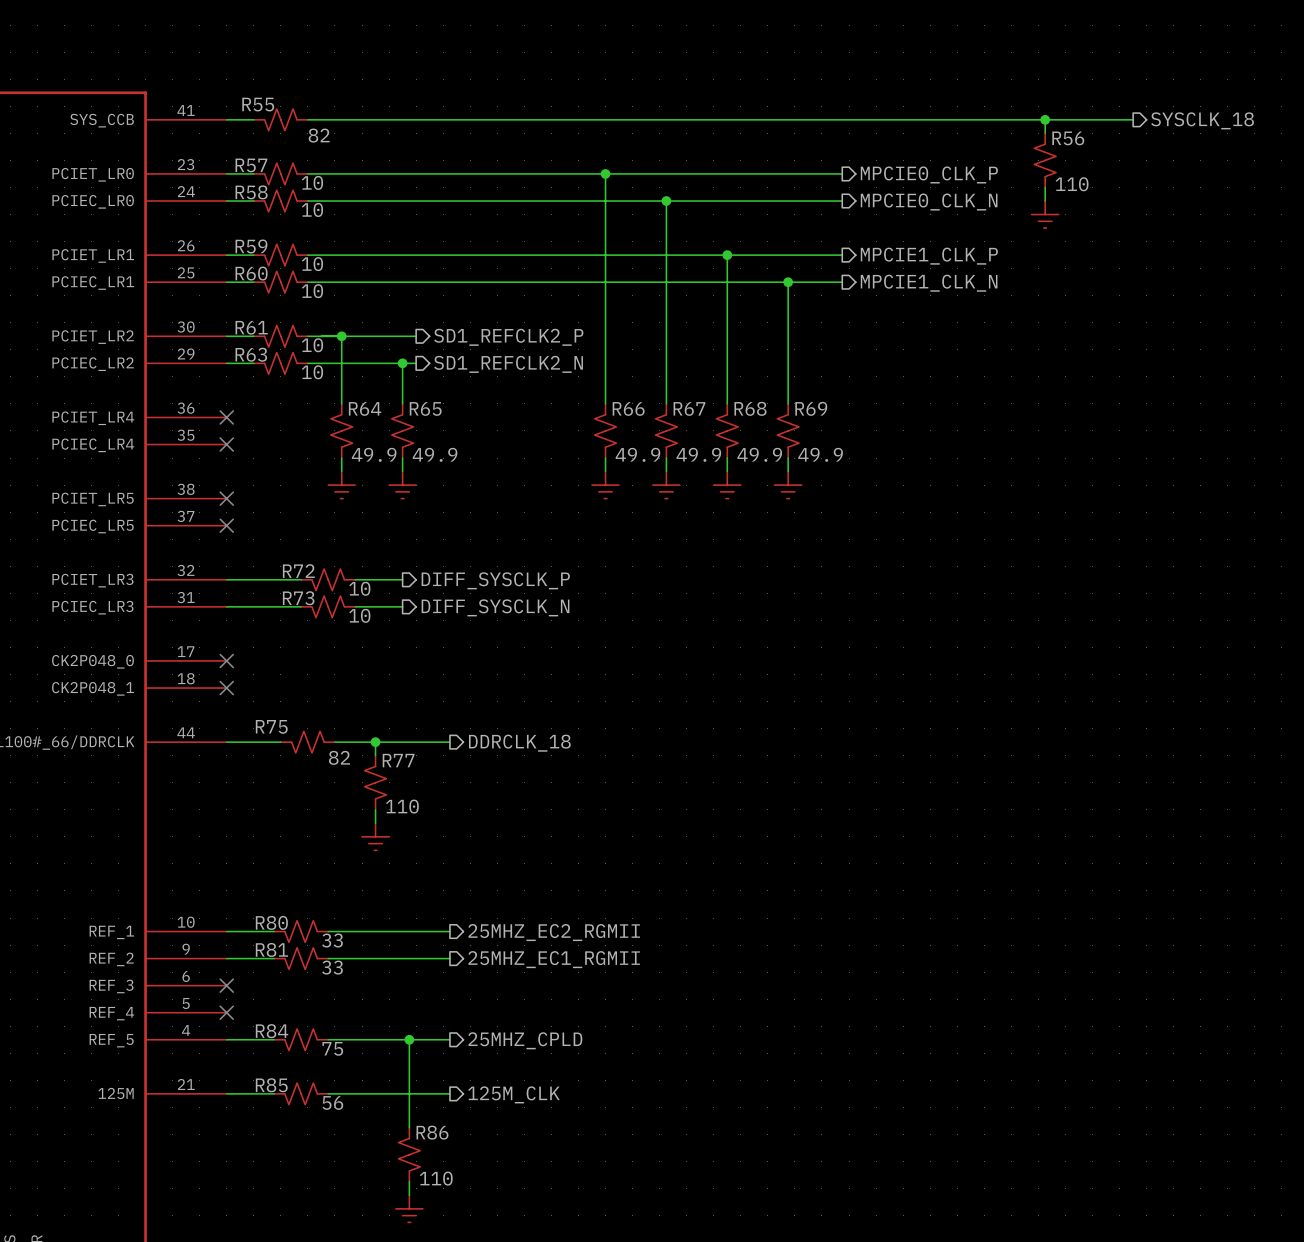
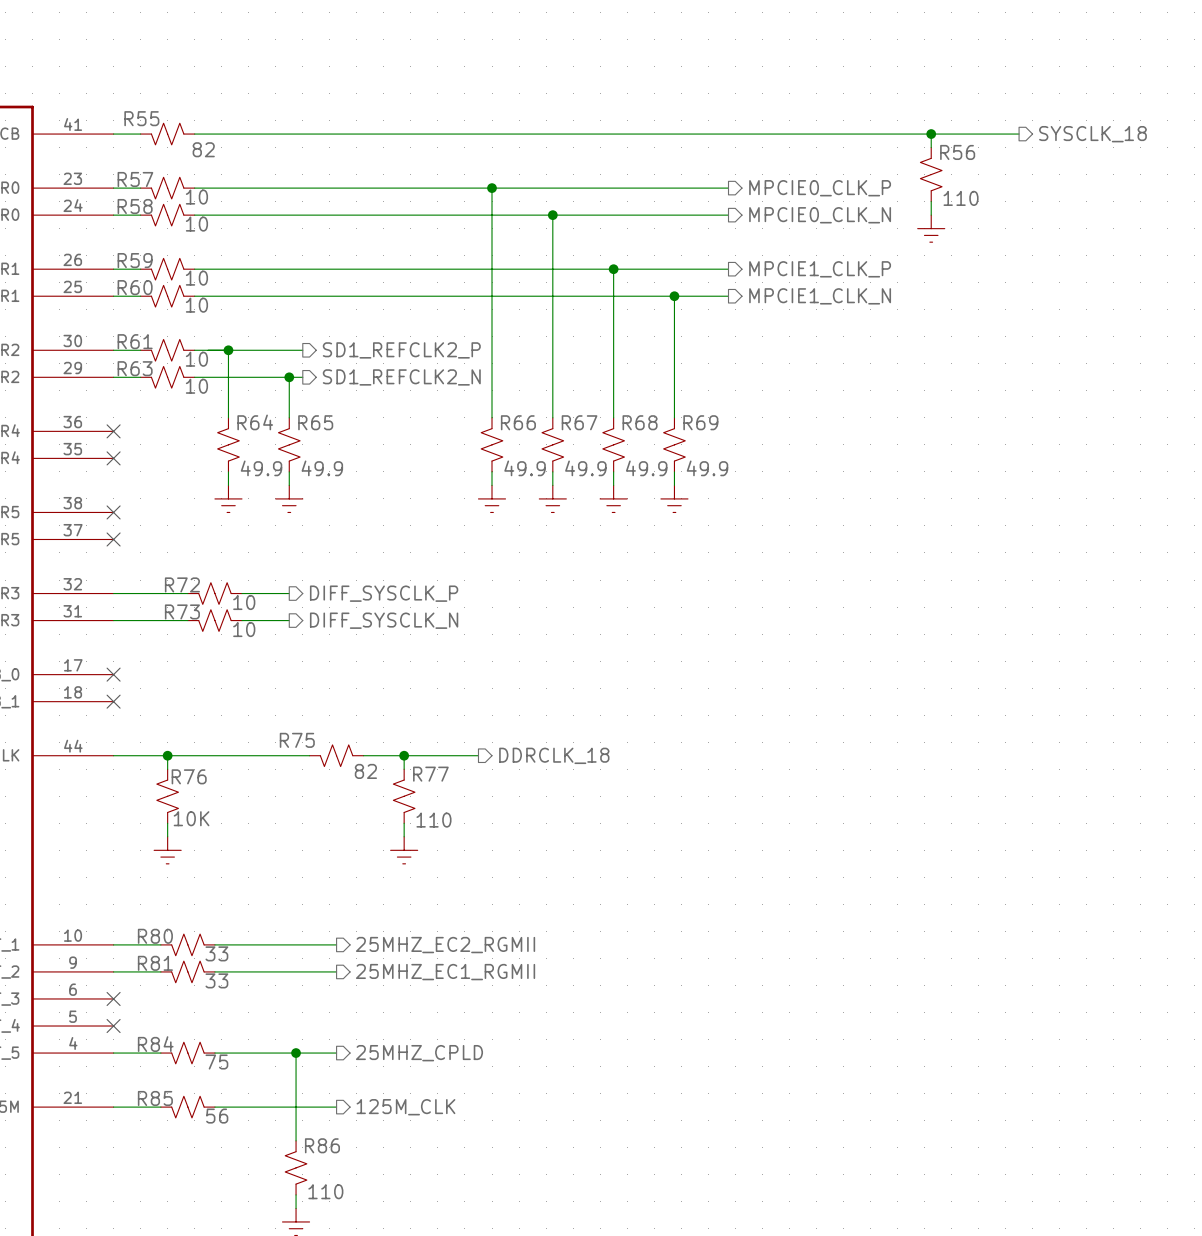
junction: none -> (167, 755)
R75 position: (307, 742) -> (336, 755)
wire: none -> (221, 755) (167, 755) (167, 769)
wire: (375, 742) (375, 755) -> (404, 755) (404, 769)
junction: (375, 742) -> none
wire: none -> (363, 755) (478, 755)
junction: none -> (404, 755)
hierarchical label position: DDRCLK_18 (519, 743) -> DDRCLK_18 (554, 755)
R76: none -> 10K (167, 796)
R77 position: (375, 782) -> (404, 796)
wire: none -> (167, 823) (167, 836)
wire: (375, 809) (375, 823) -> (404, 823) (404, 836)
power symbol: none -> (167, 850)
power symbol: (375, 836) -> none
power symbol: none -> (404, 850)

